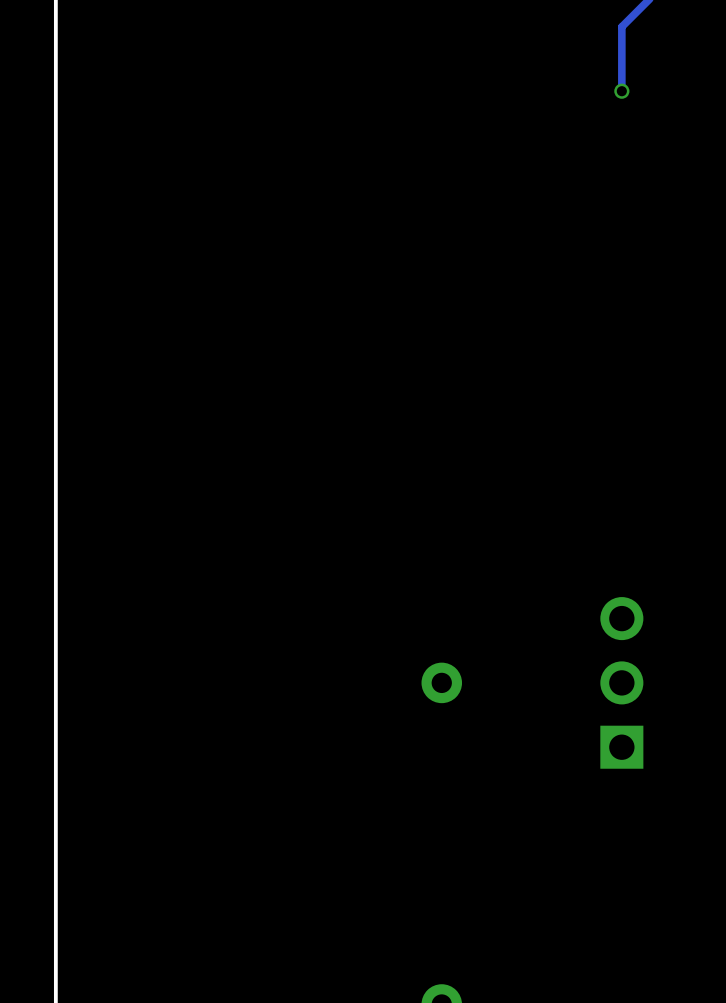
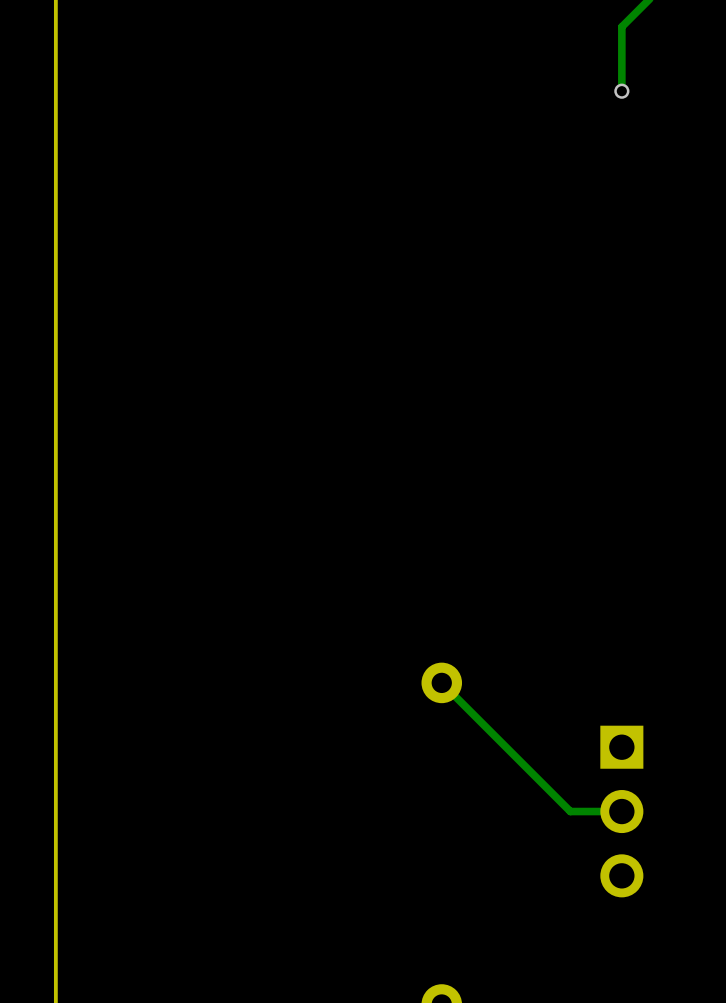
track: none -> (441, 682) (570, 811) (621, 811)
part rotation: 0° (621, 682) -> 180° (621, 811)
part position: (621, 682) -> (621, 811)

